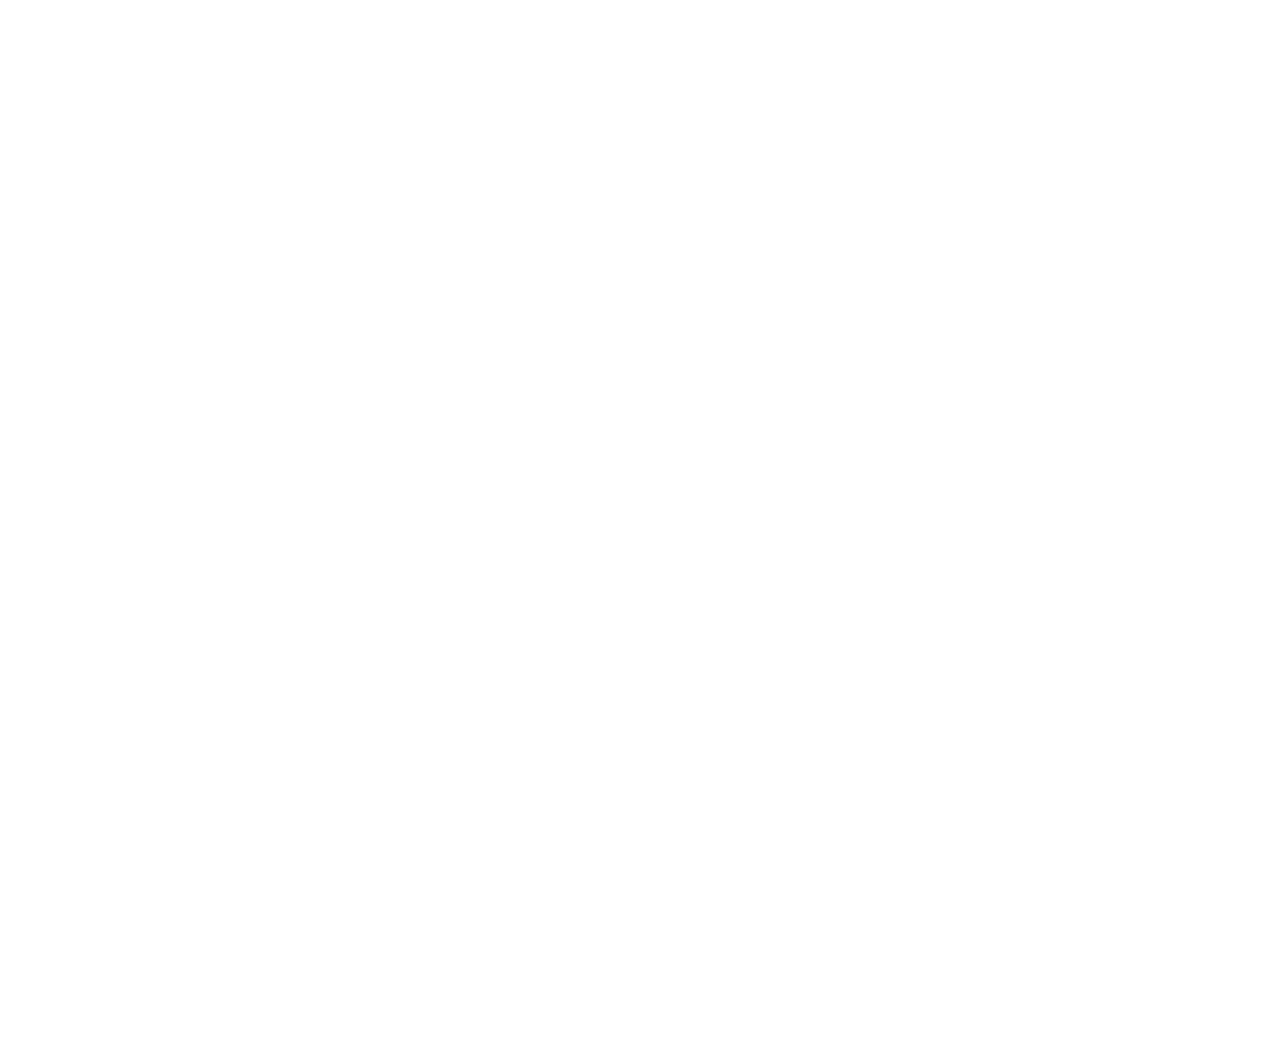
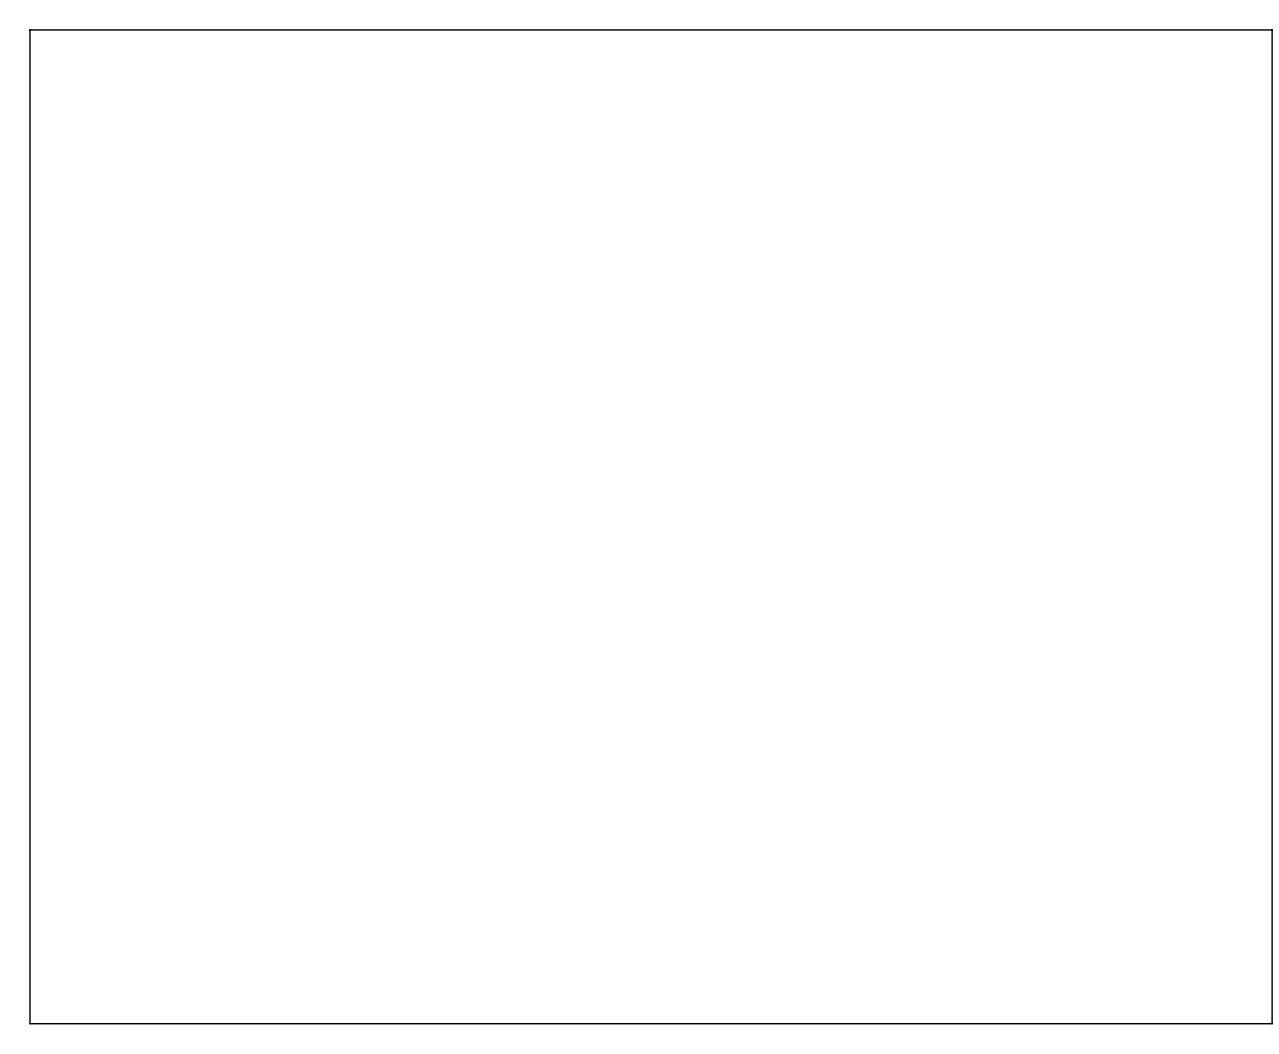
board edge: none -> (29, 29) (1272, 29) (1272, 1023) (29, 1023) (29, 29)

